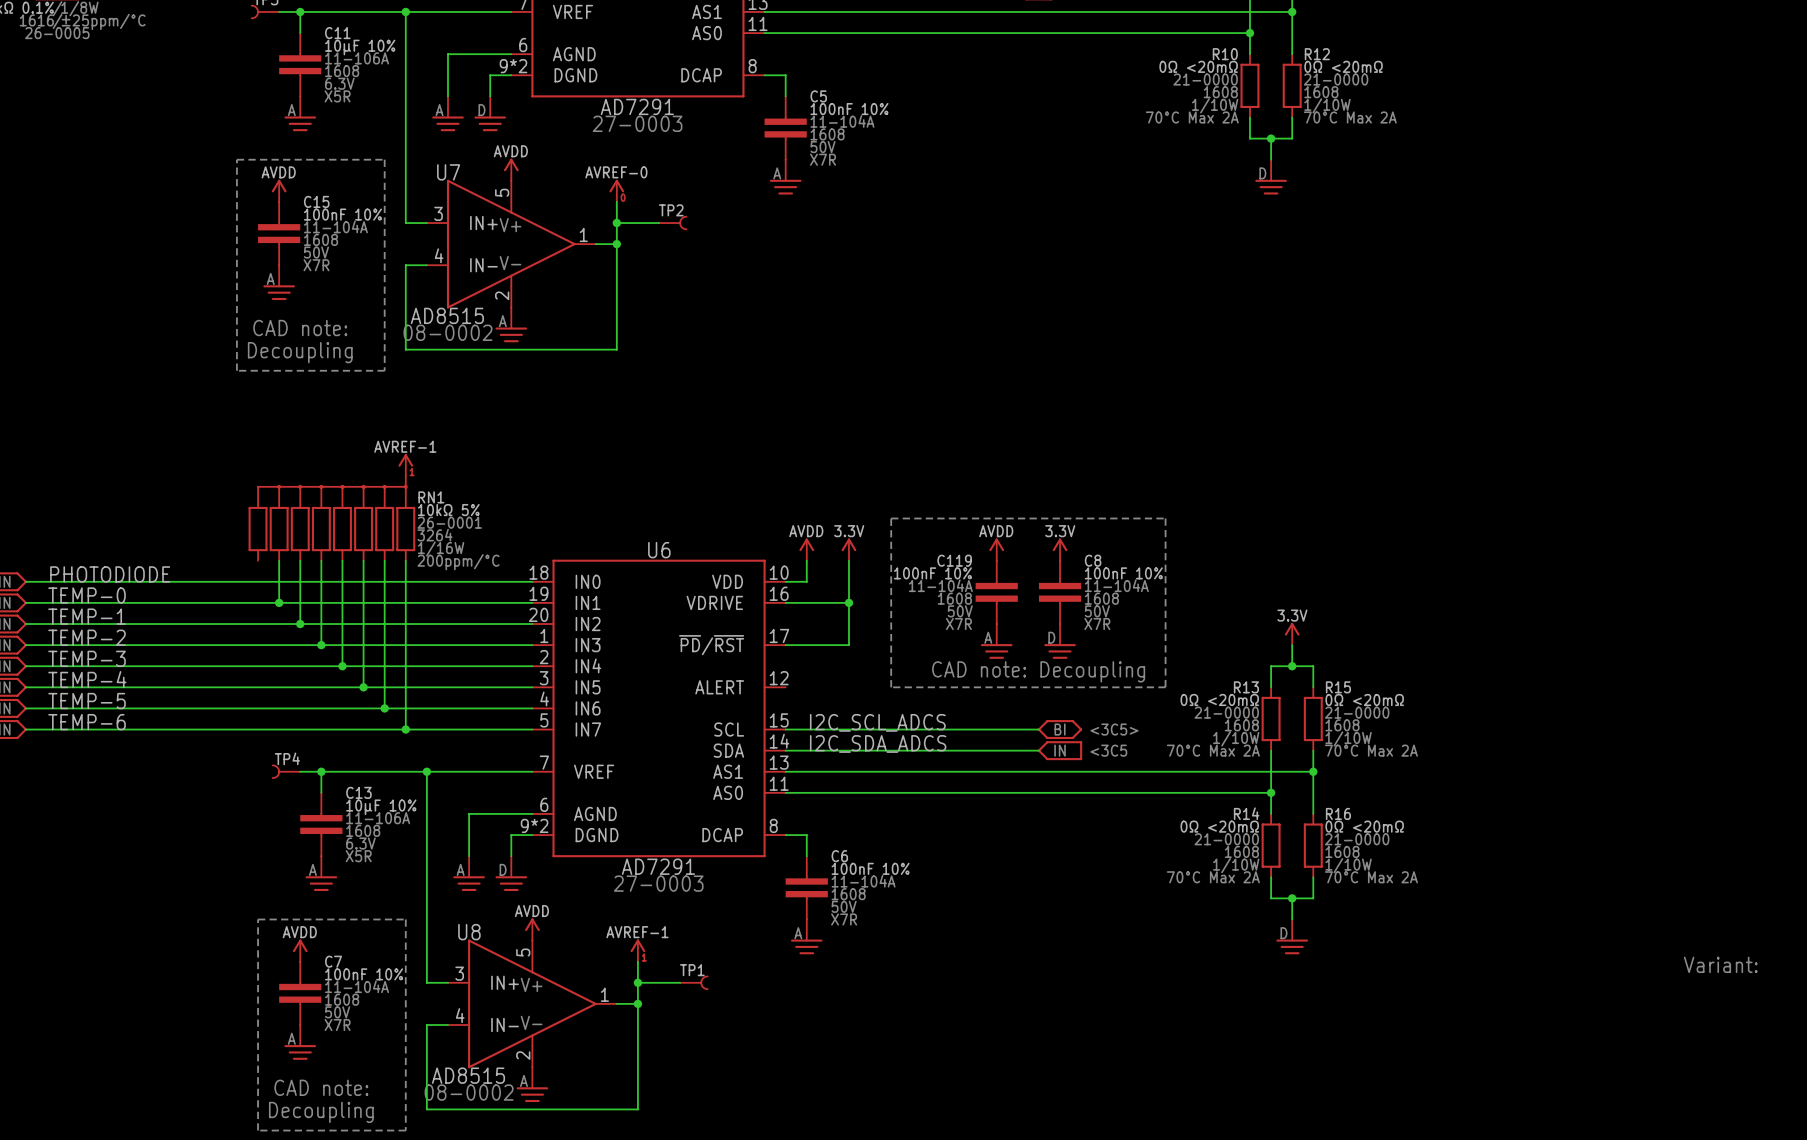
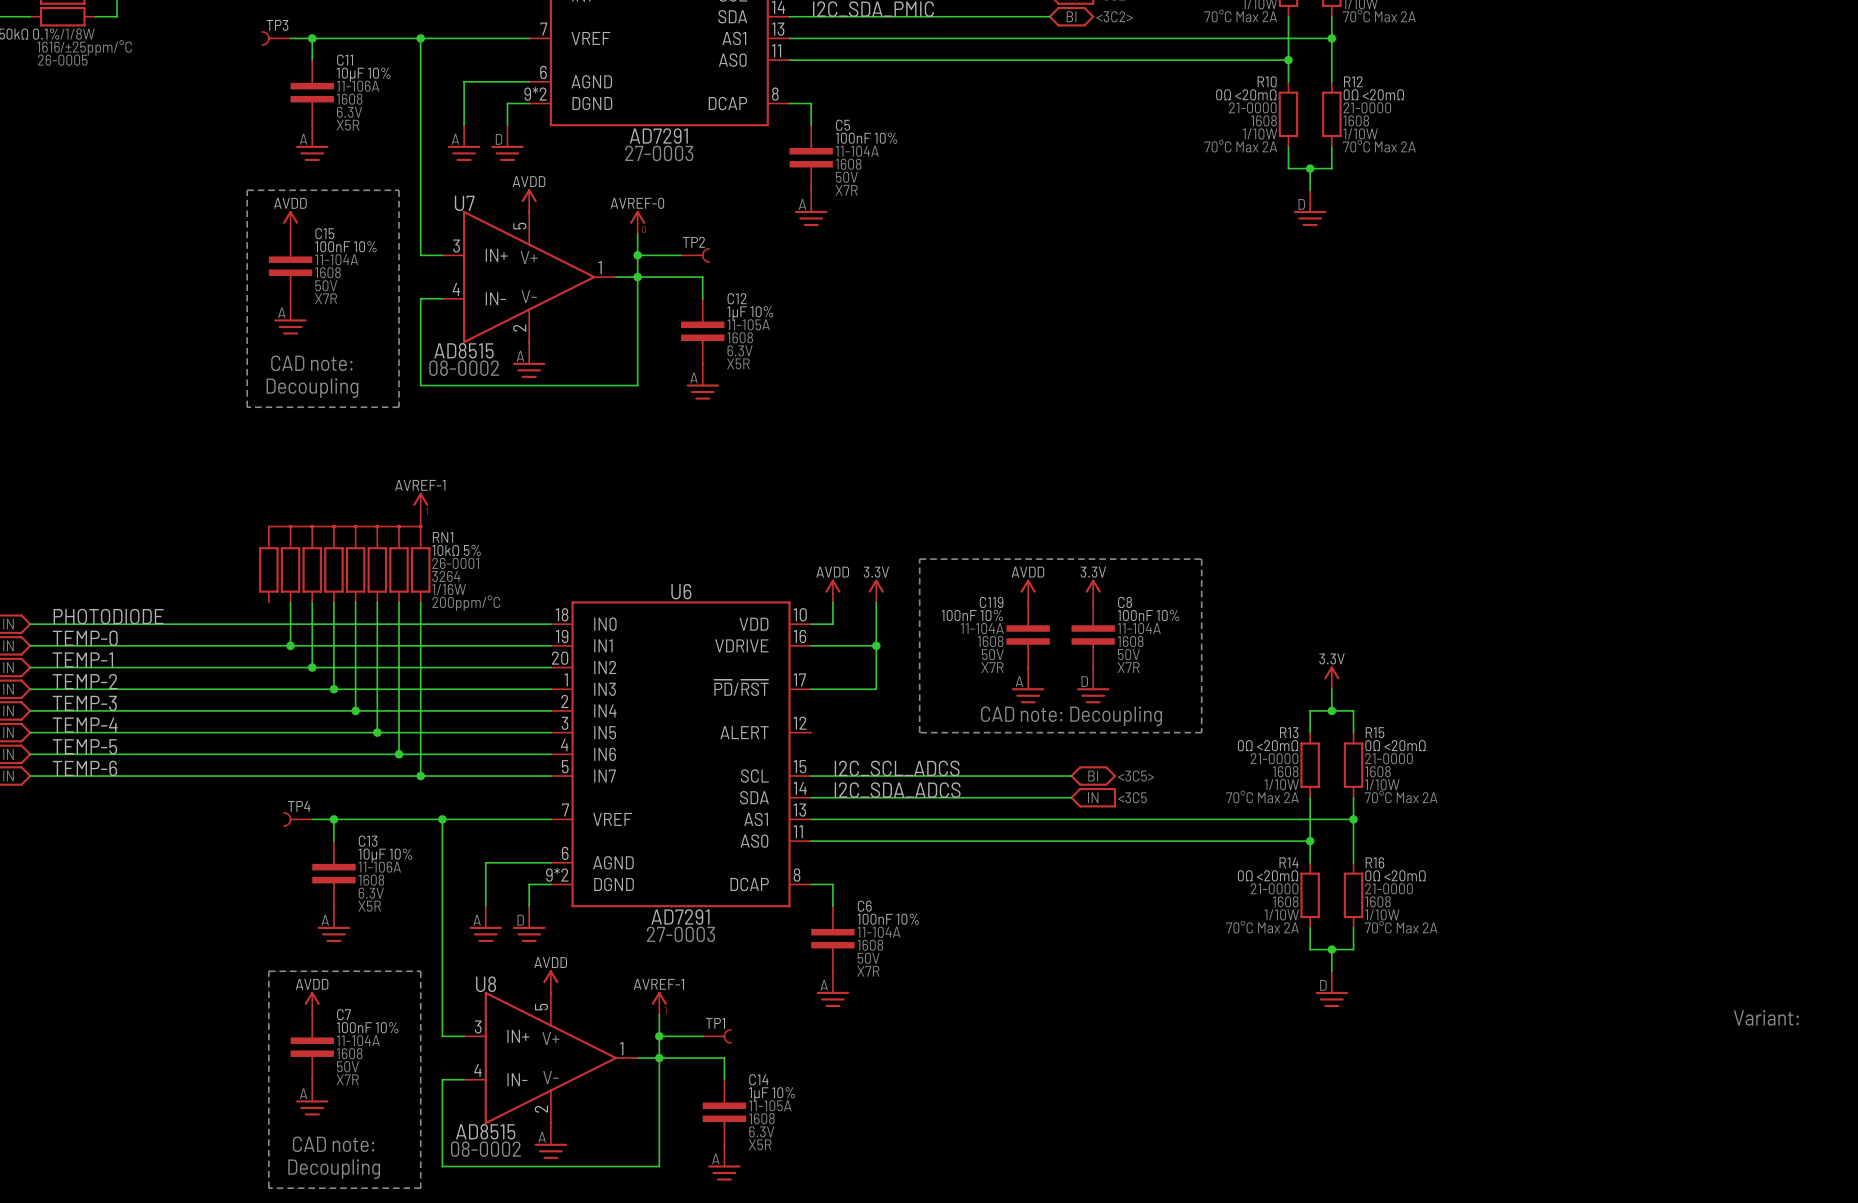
wire: none -> (637, 277) (702, 277) (702, 298)
C12: none -> 1µF 10% (702, 331)
power symbol: none -> (702, 381)
wire: none -> (659, 1058) (724, 1058) (724, 1079)
C14: none -> 1µF 10% (724, 1112)
power symbol: none -> (724, 1162)

